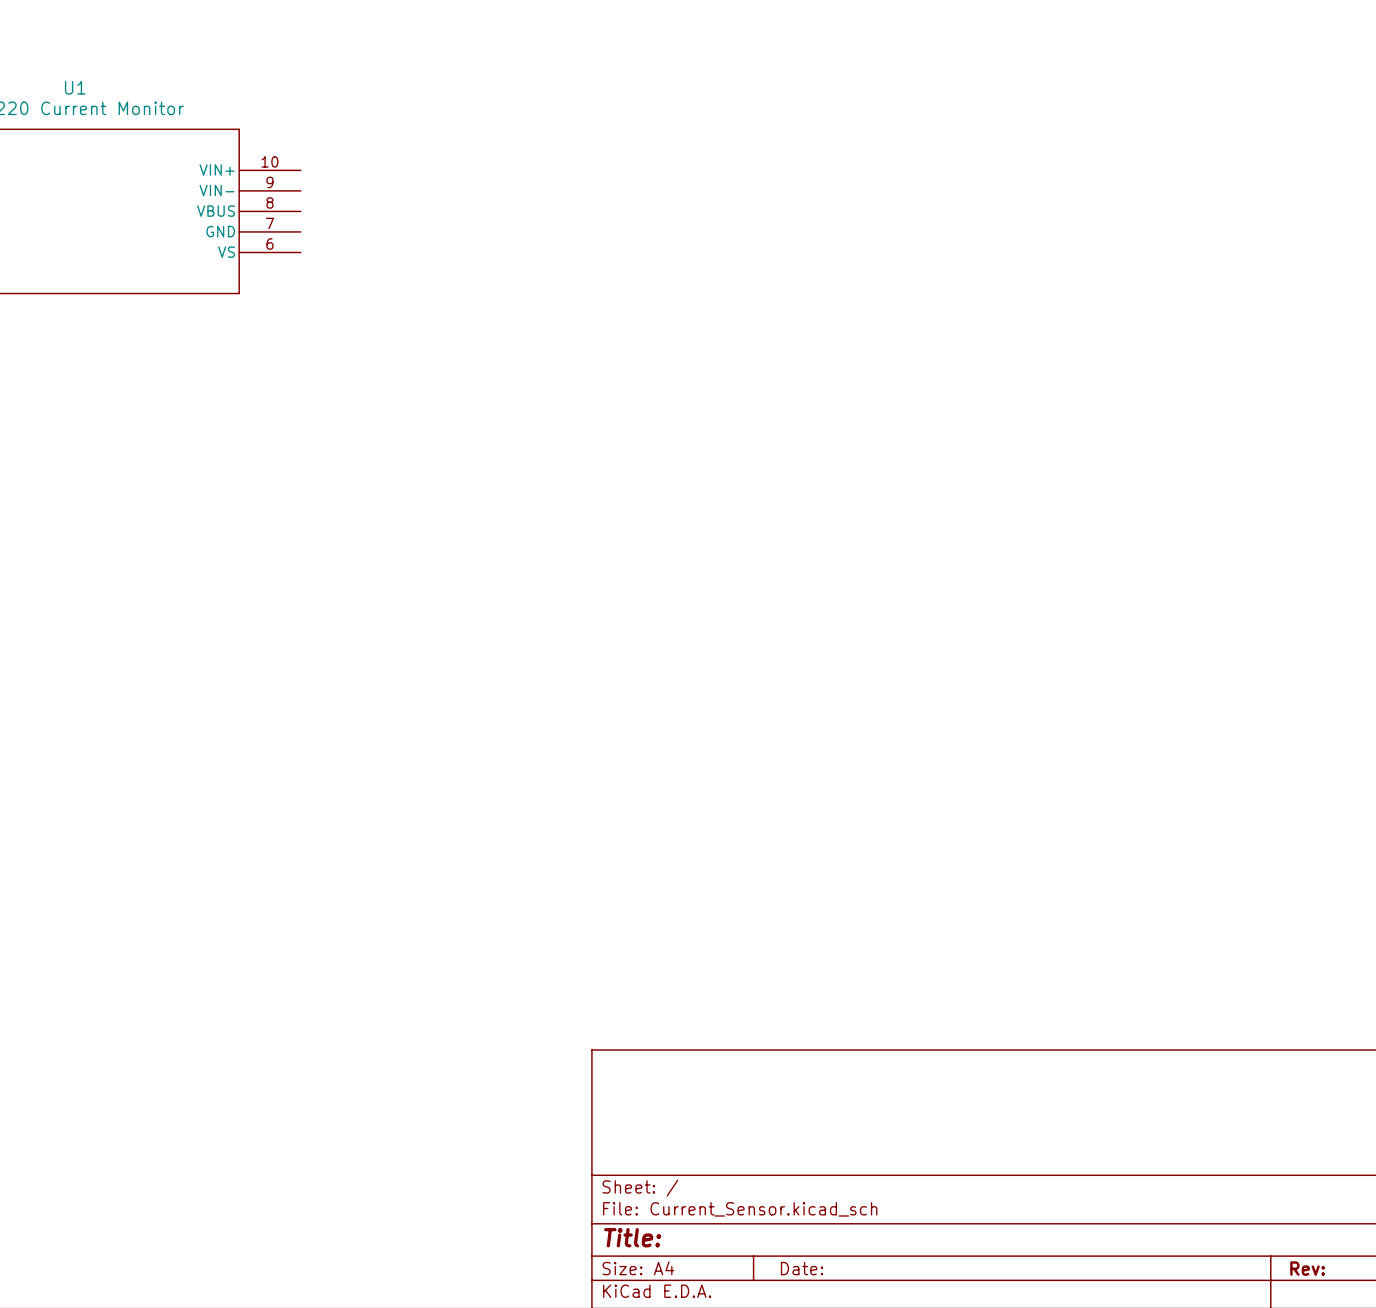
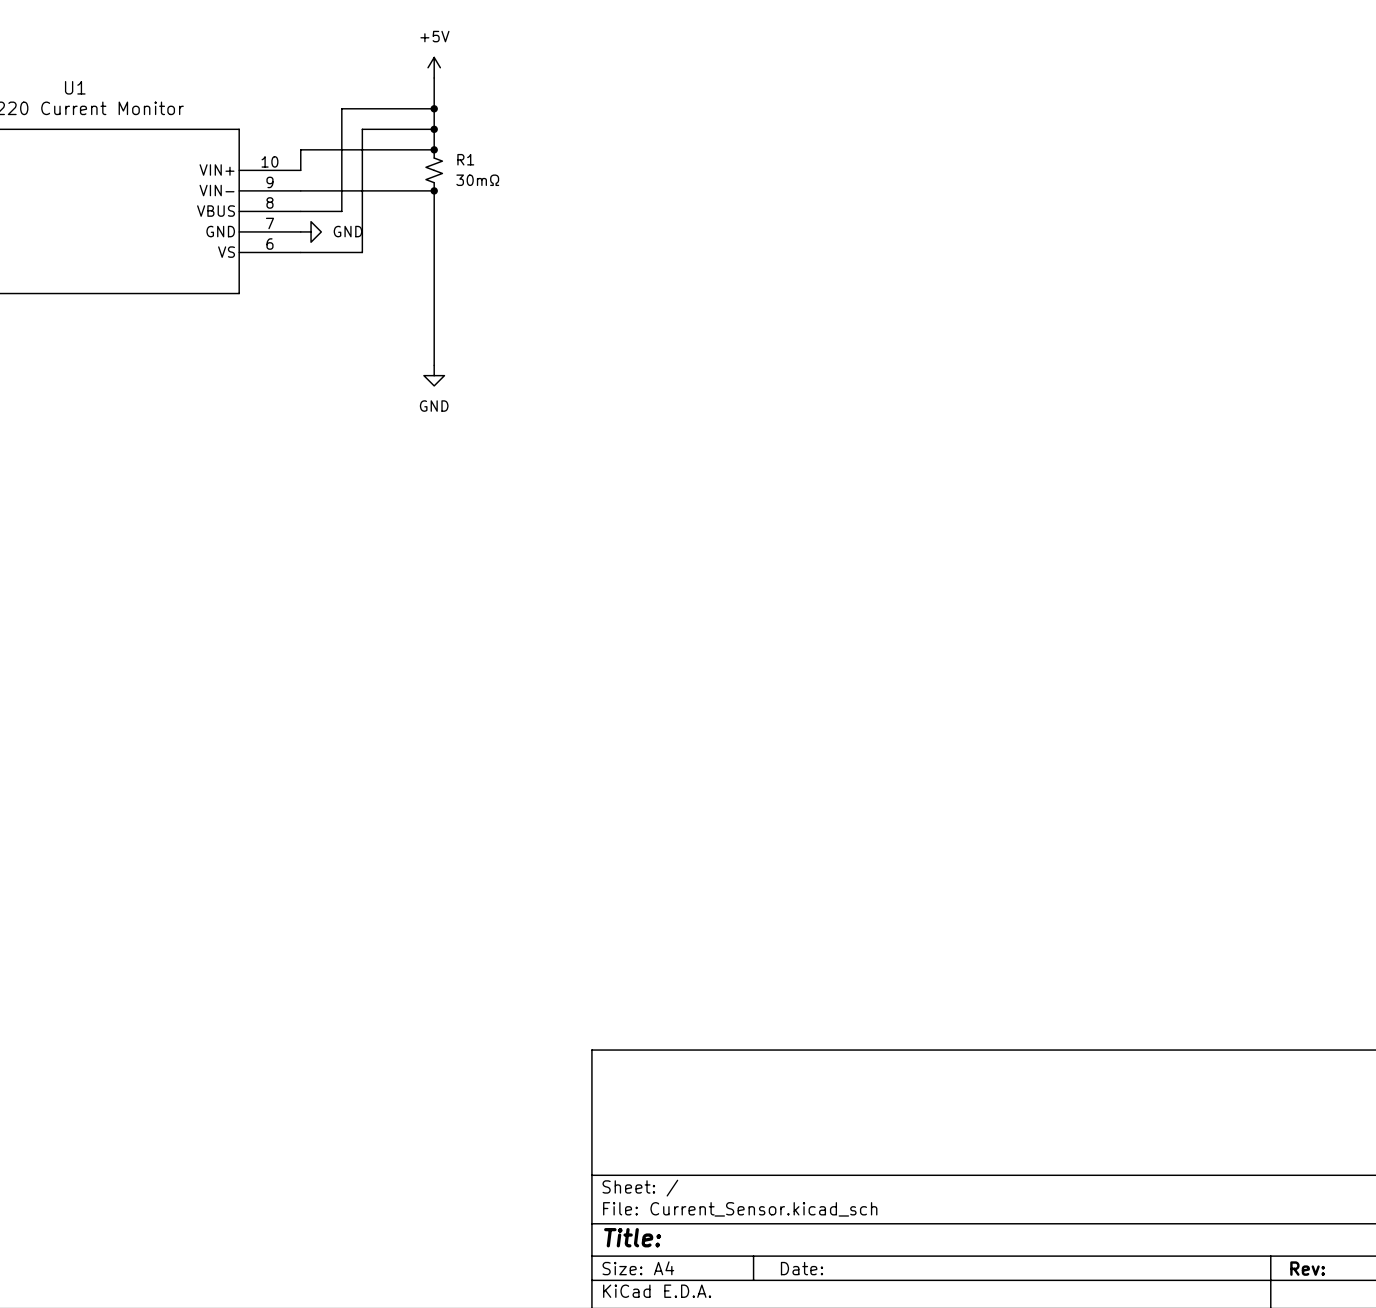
power symbol: none -> +5V (434, 67)
wire: none -> (434, 78) (434, 149) (300, 149) (300, 170)
wire: none -> (434, 108) (341, 108) (341, 211) (300, 211)
junction: none -> (434, 108)
wire: none -> (434, 129) (362, 129) (362, 252) (300, 252)
junction: none -> (434, 129)
junction: none -> (434, 149)
R1: none -> 30mΩ (434, 170)
wire: none -> (300, 190) (434, 190) (434, 365)
junction: none -> (434, 190)
power symbol: none -> GND (311, 231)
power symbol: none -> GND (434, 375)

